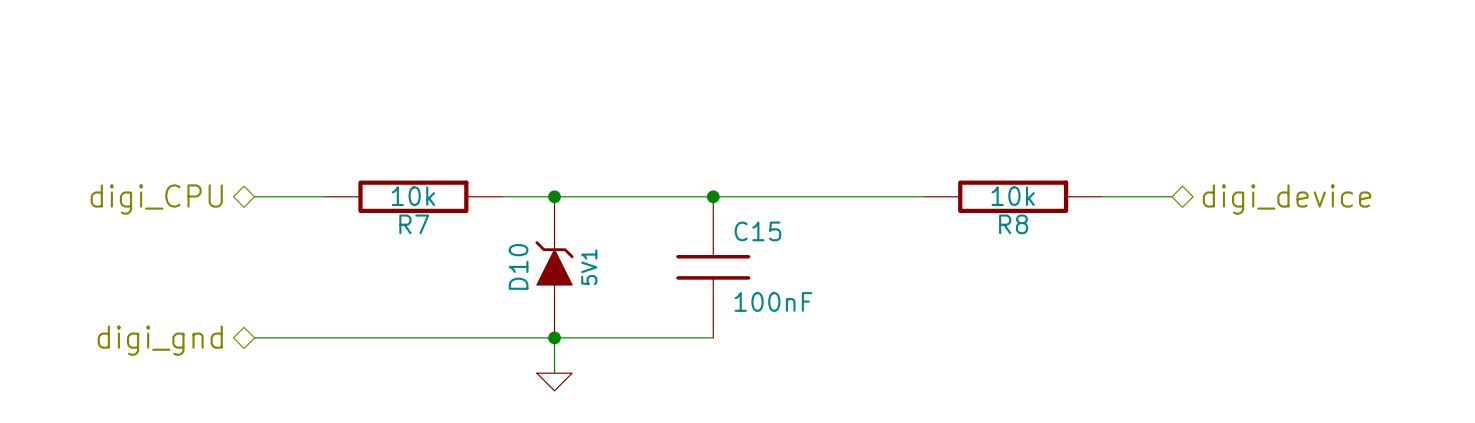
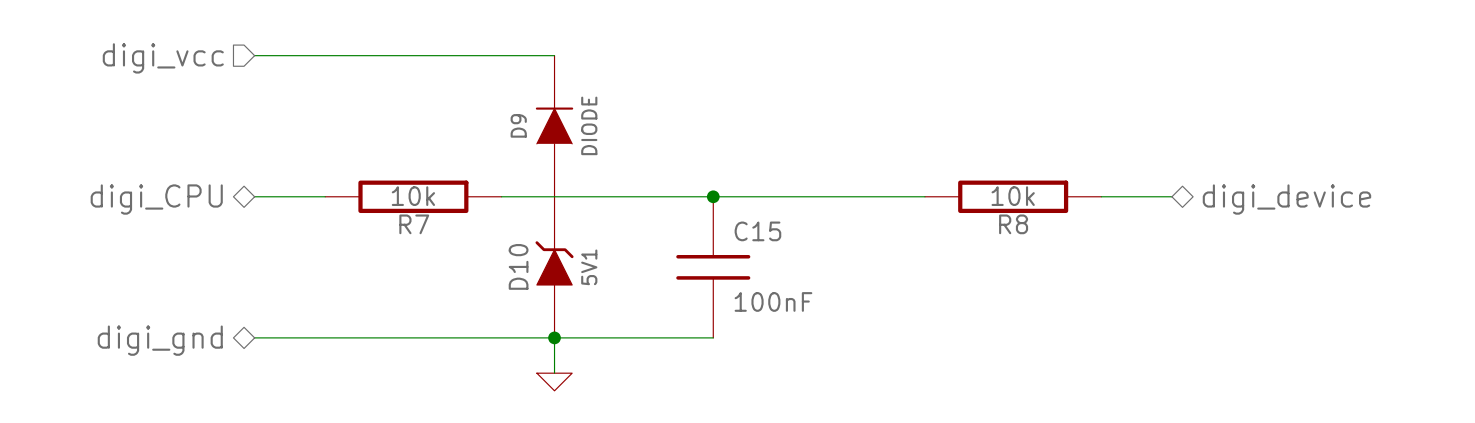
wire: none -> (254, 55) (554, 55)
hierarchical label: none -> digi_vcc (163, 58)
D9: none -> DIODE (554, 126)
junction: (554, 196) -> none

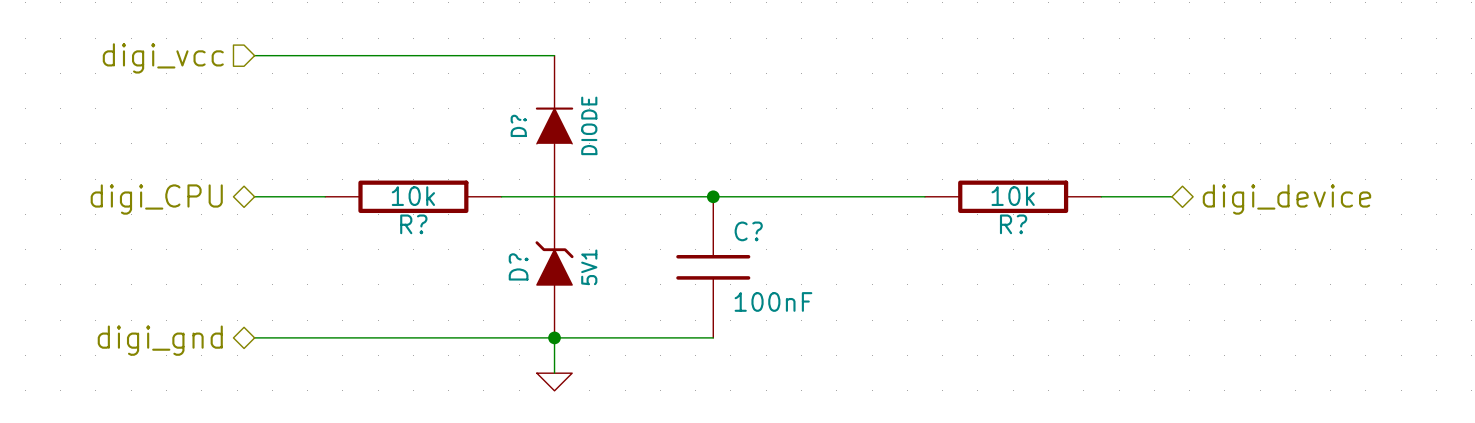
D9 name: D9 (518, 125) -> D? (518, 125)
R7 name: R7 (414, 224) -> R? (413, 224)
R8 name: R8 (1013, 224) -> R? (1013, 224)
C15 name: C15 (757, 231) -> C? (748, 231)
D10 name: D10 (518, 266) -> D? (518, 266)

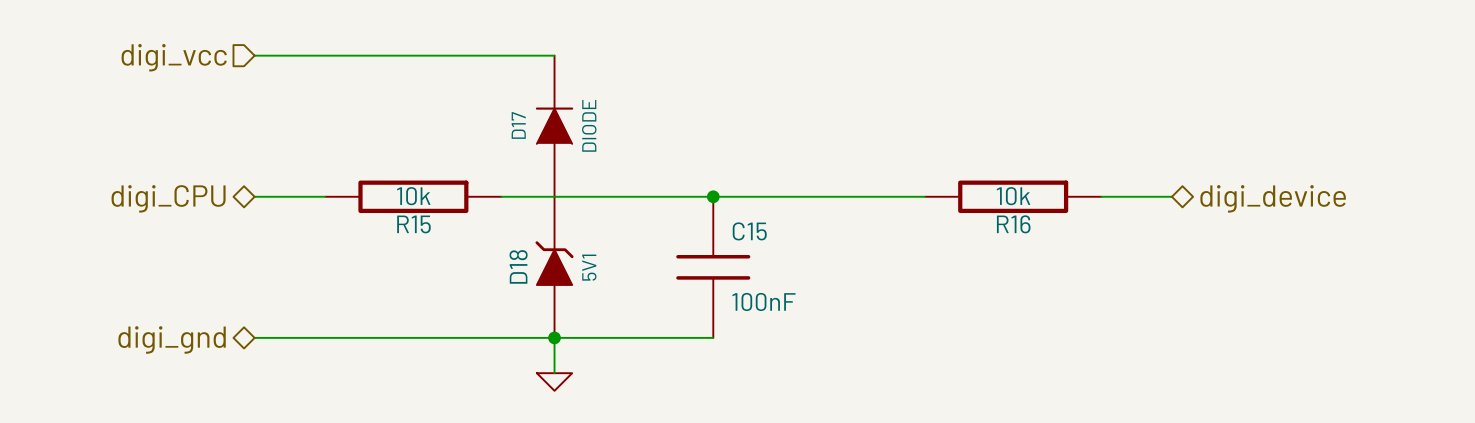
D? name: D? (518, 125) -> D17 (518, 125)
R? name: R? (413, 224) -> R15 (413, 224)
R? name: R? (1013, 224) -> R16 (1013, 224)
C? name: C? (748, 231) -> C15 (749, 231)
D? name: D? (518, 266) -> D18 (518, 266)

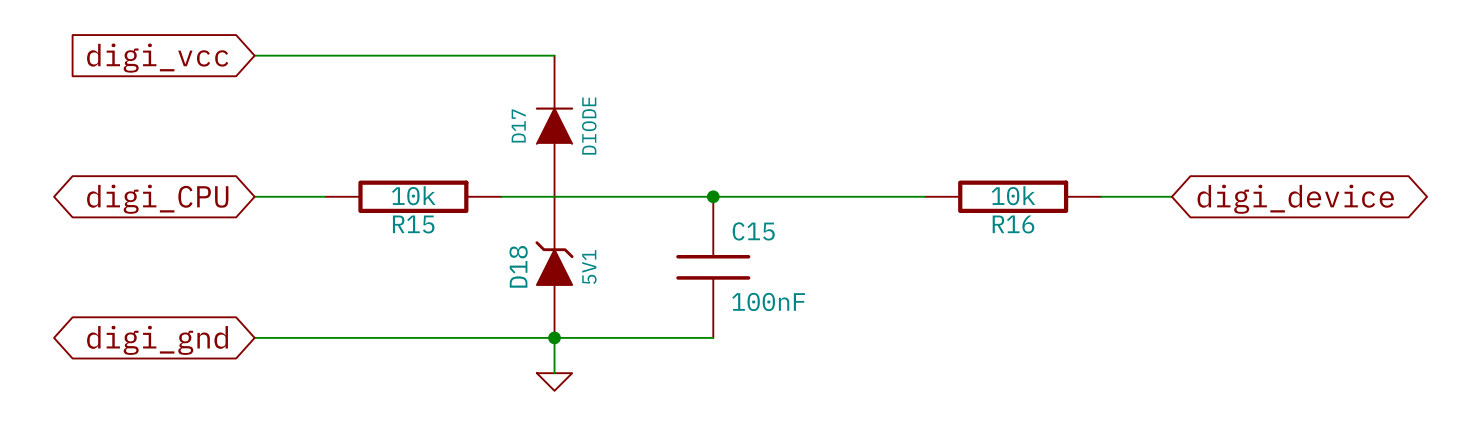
hierarchical label: digi_vcc (174, 57) -> none
global label: none -> digi_vcc (157, 58)
hierarchical label: digi_CPU (168, 198) -> none
hierarchical label: digi_device (1273, 198) -> none
global label: none -> digi_CPU (157, 199)
global label: none -> digi_device (1295, 199)
hierarchical label: digi_gnd (172, 339) -> none
global label: none -> digi_gnd (157, 340)

